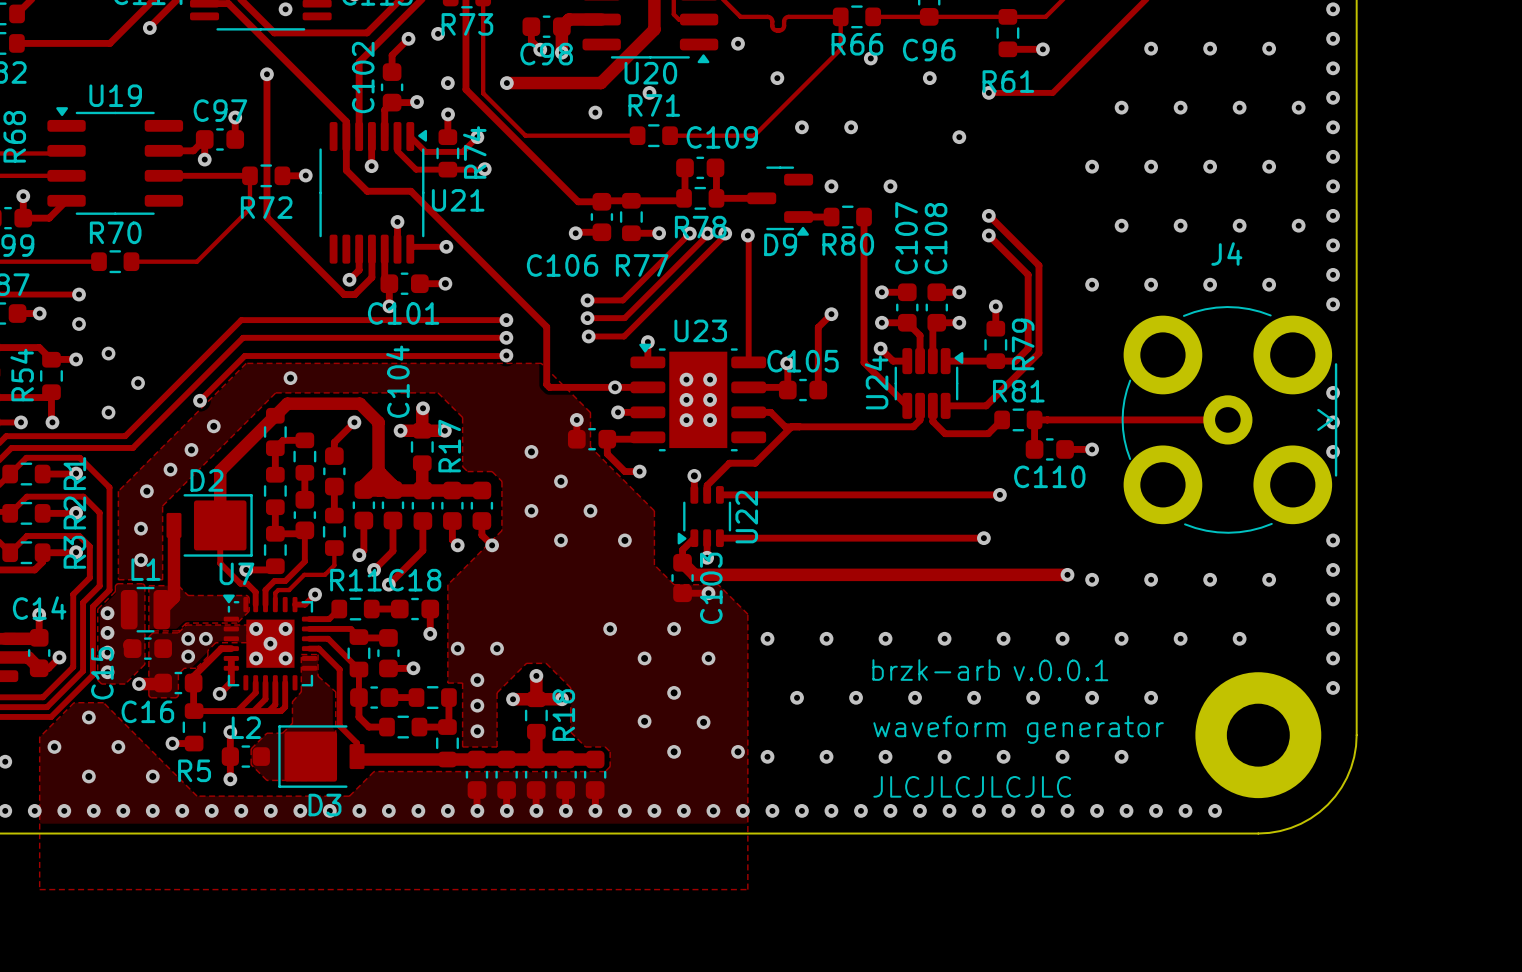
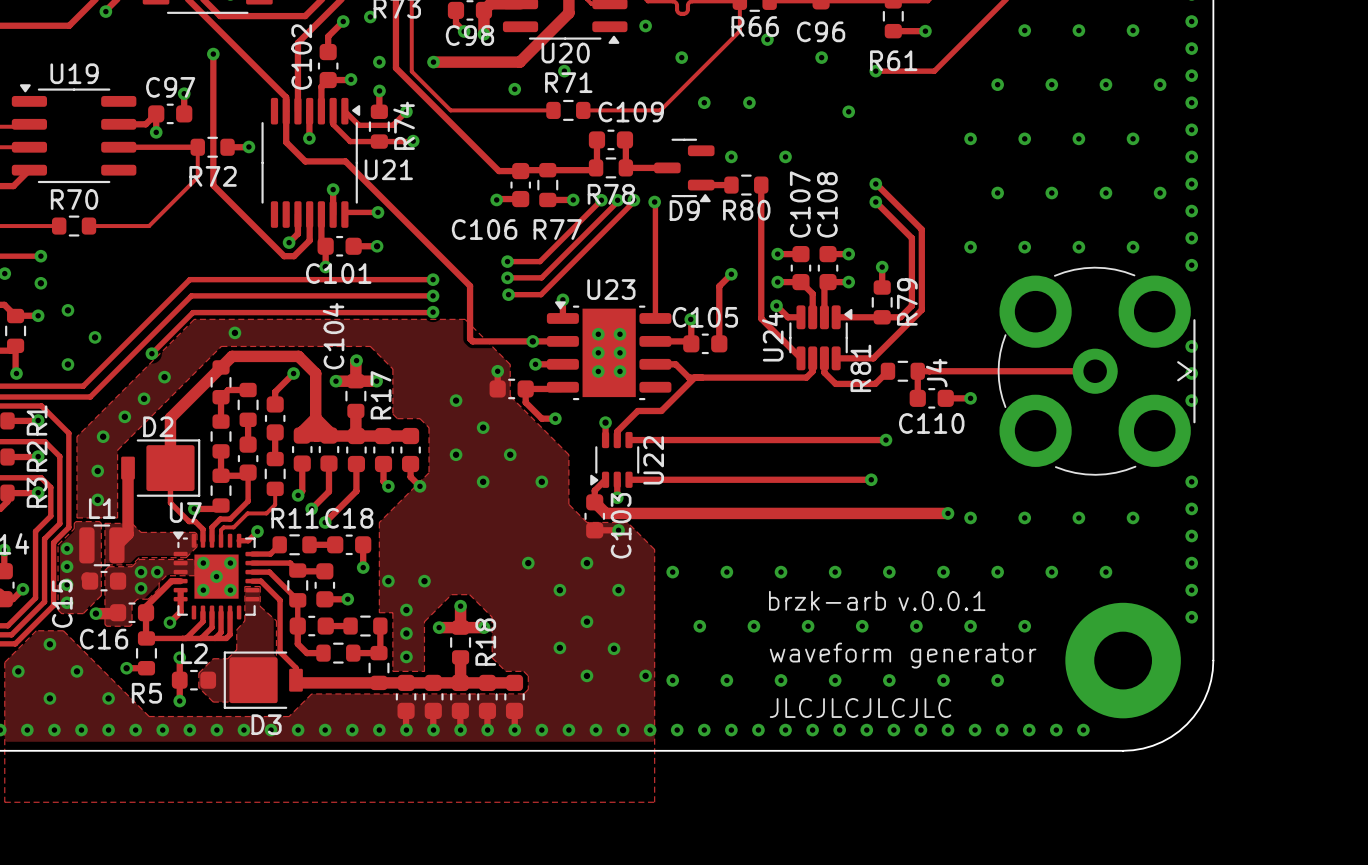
J4 name rotation: 0° (1226, 253) -> 90° counterclockwise (936, 373)
J4 name position: J4 (1226, 253) -> J4 (936, 373)
R81 name rotation: 0° (1018, 391) -> 90° counterclockwise (860, 368)

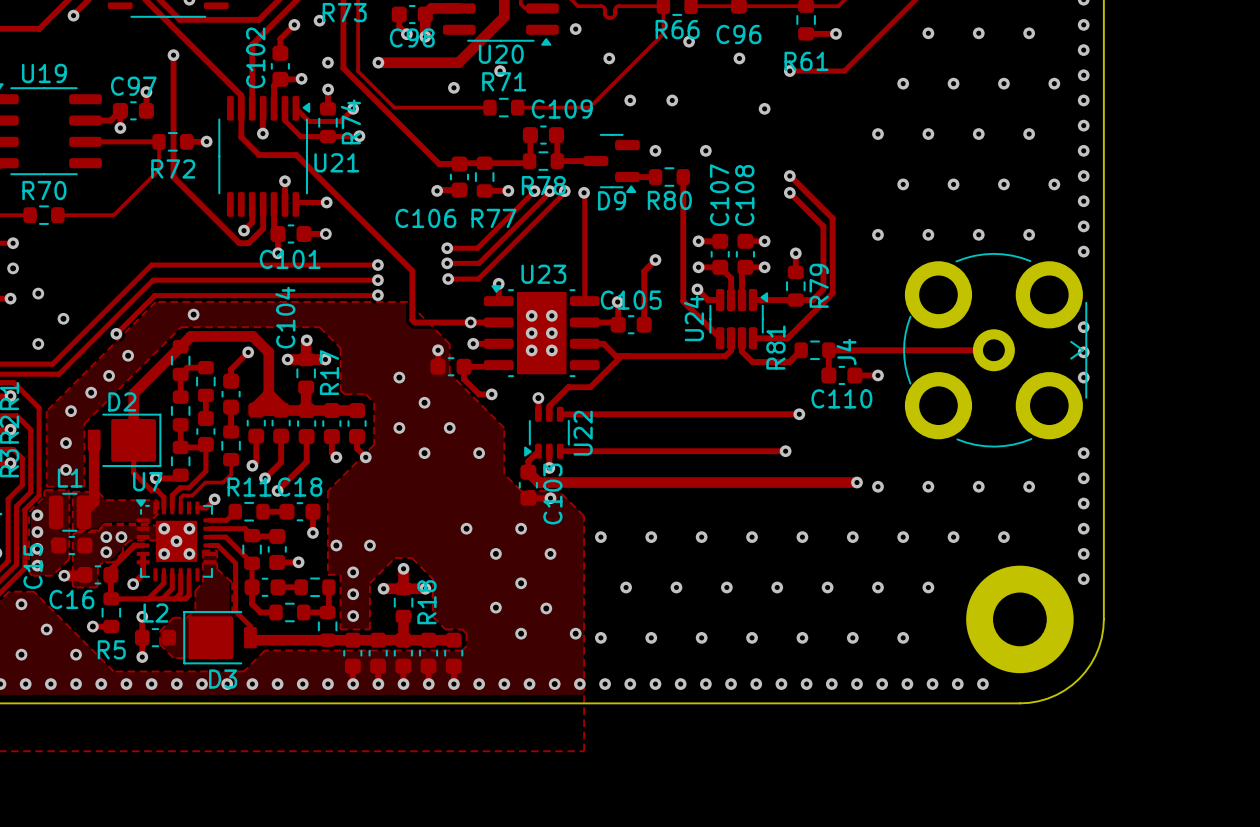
text: brzk-arb (827, 600) -> none
text: v.0.0.1 (941, 601) -> none
text: waveform generator (903, 655) -> none
text: JLCJLCJLCJLC (860, 707) -> none

